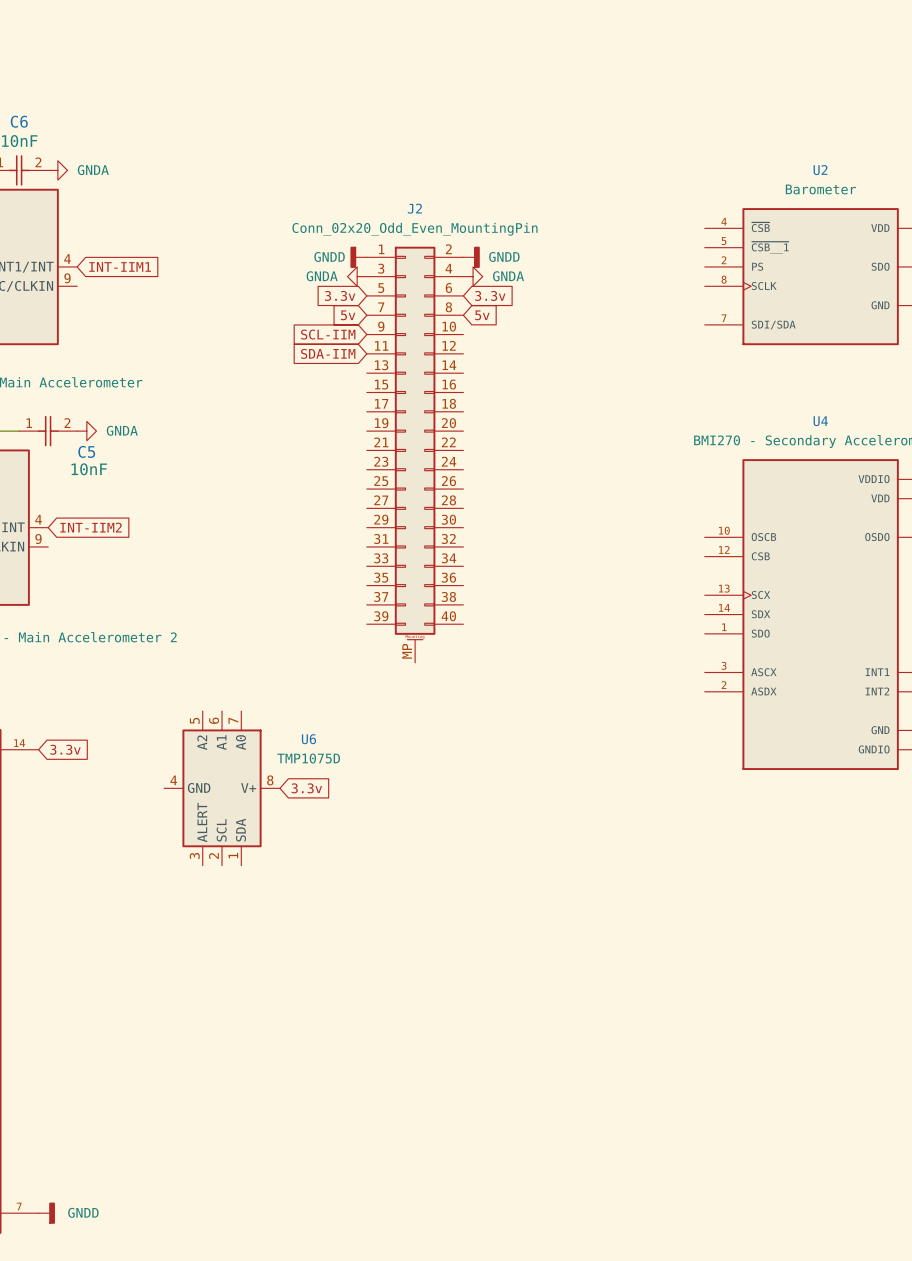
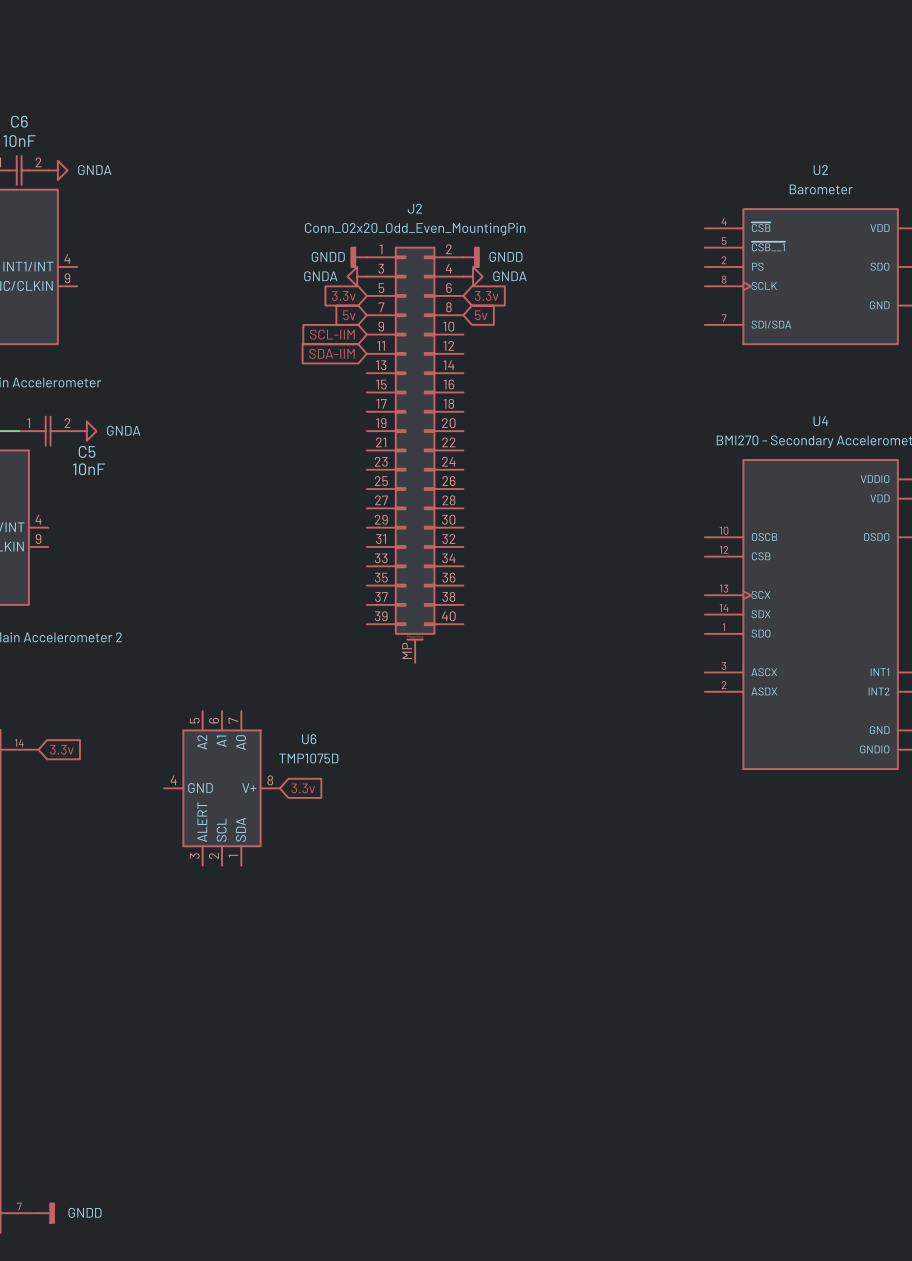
global label: INT-IIM1 (120, 266) -> none
global label: INT-IIM2 (91, 527) -> none

